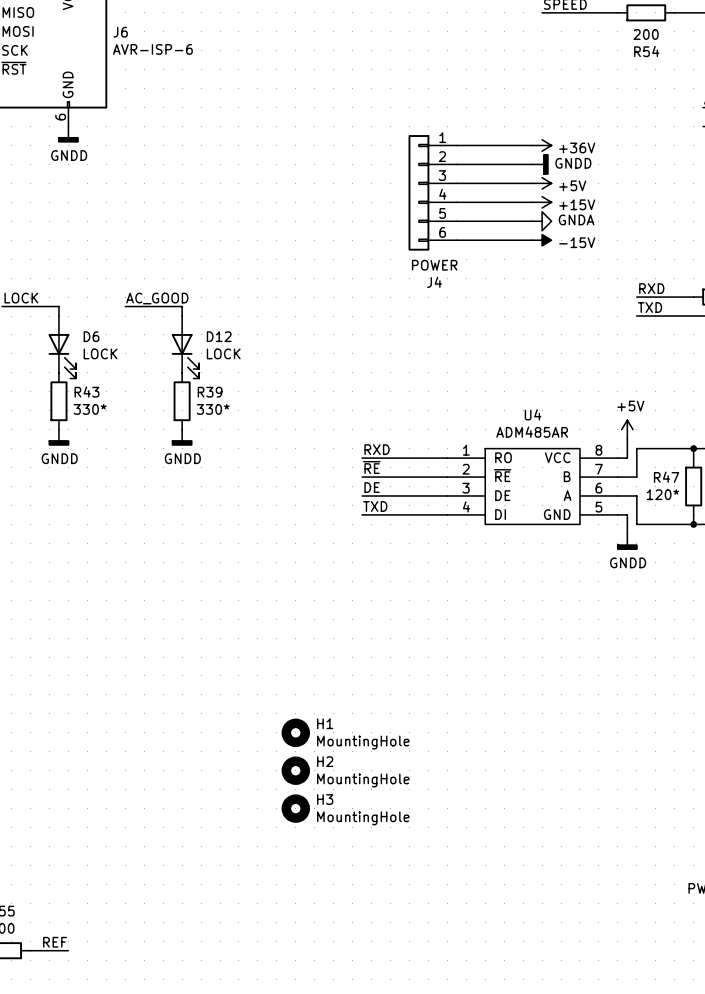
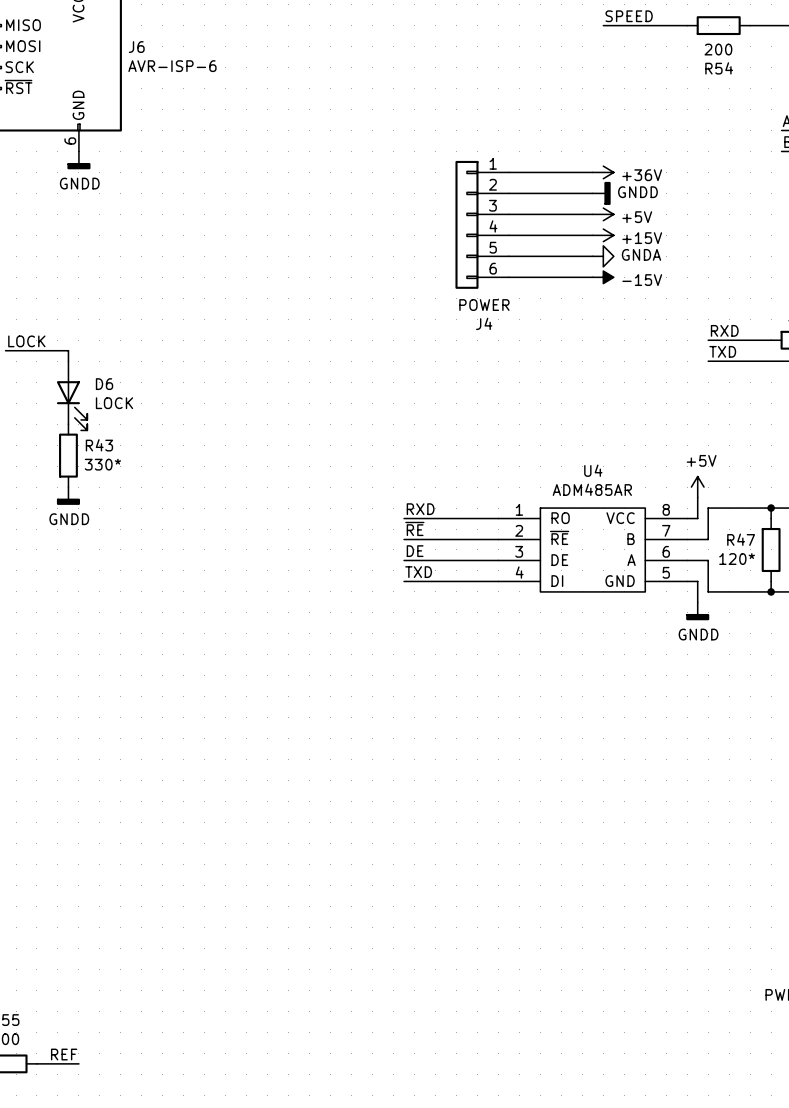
label: AC_GOOD (157, 298) -> none
wire: (125, 306) (182, 306) (182, 316) -> none
D12: LOCK (185, 347) -> none
R39: 330* (182, 401) -> none
power symbol: GNDD (182, 437) -> none
H1: MountingHole (295, 732) -> none
H2: MountingHole (295, 770) -> none
H3: MountingHole (295, 808) -> none

